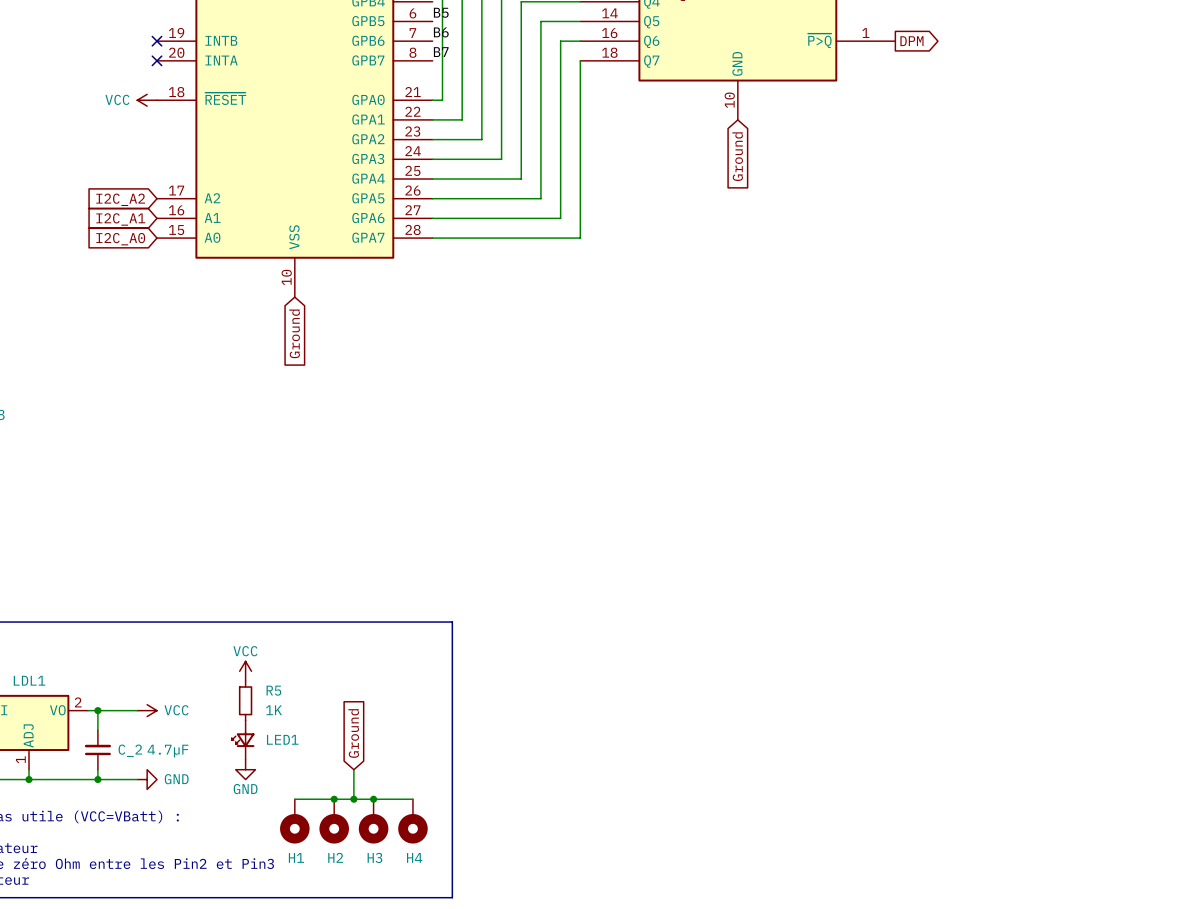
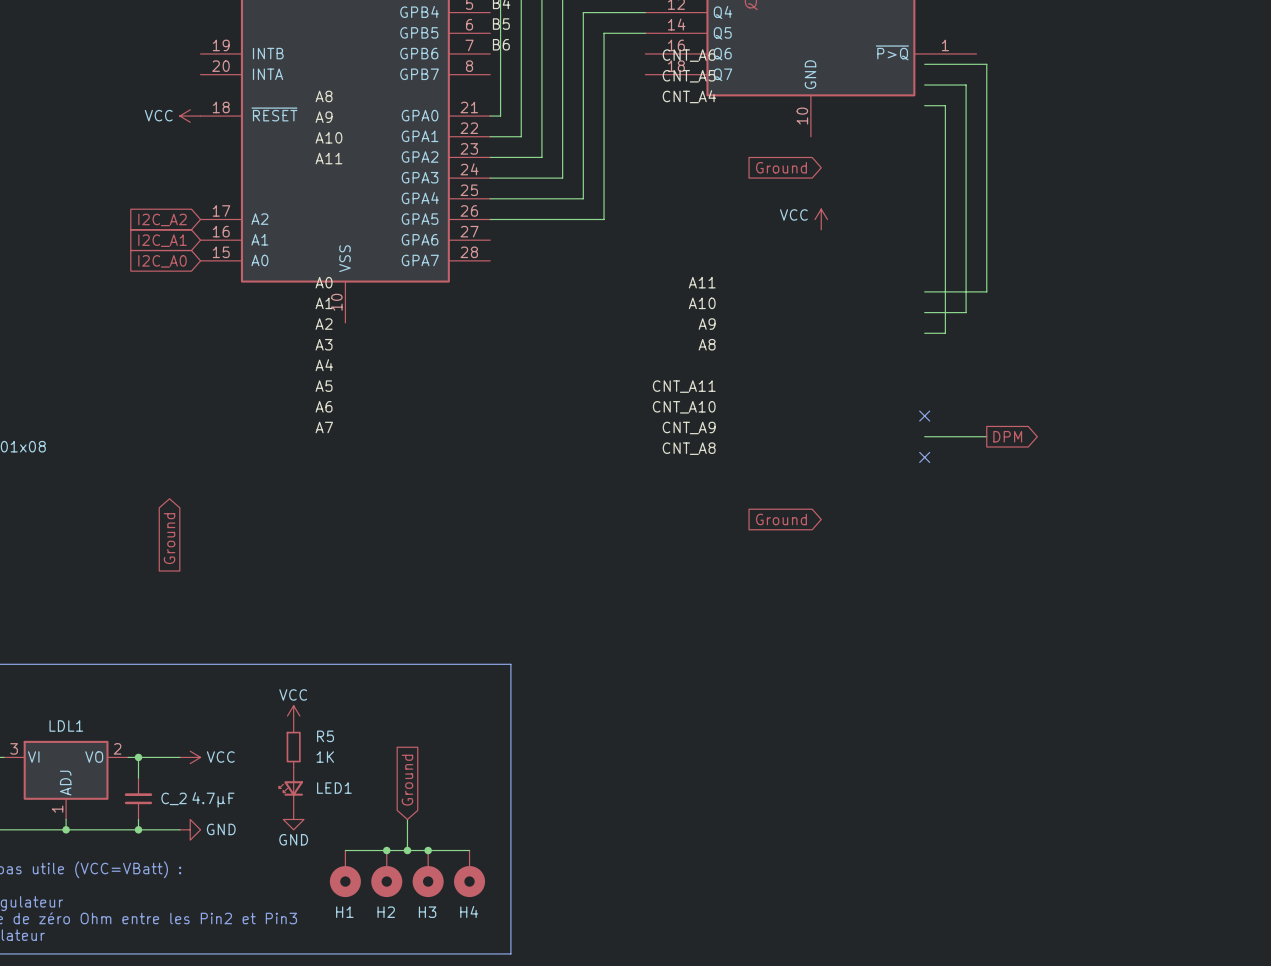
no-connect mark: (156, 41) -> none
wire: (580, 41) (560, 41) (560, 218) (432, 218) -> none
global label: DPM (911, 41) -> none
label: none -> CNT_A6 (689, 55)
wire: none -> (924, 64) (986, 64) (986, 291) (924, 291)
label: B7 (441, 52) -> none
no-connect mark: (156, 60) -> none
wire: (580, 60) (580, 238) (432, 238) -> none
label: none -> CNT_A5 (689, 76)
wire: none -> (924, 85) (966, 85) (966, 312) (924, 312)
label: none -> A8 (324, 96)
label: none -> CNT_A4 (689, 96)
wire: none -> (924, 105) (945, 105) (945, 333) (924, 333)
label: none -> A9 (324, 117)
label: none -> A10 (328, 137)
label: none -> A11 (328, 158)
global label rotation: 0° (737, 156) -> 90° clockwise (781, 167)
power symbol: none -> VCC (821, 219)
label: none -> A0 (324, 282)
label: none -> A11 (702, 282)
label: none -> A1 (324, 303)
label: none -> A10 (702, 303)
label: none -> A2 (324, 324)
label: none -> A9 (707, 324)
label: none -> A3 (324, 344)
label: none -> A8 (707, 344)
global label: Ground (294, 333) -> none
label: none -> A4 (324, 365)
label: none -> A5 (324, 386)
label: none -> CNT_A11 (684, 386)
label: none -> A6 (324, 406)
label: none -> CNT_A10 (684, 407)
no-connect mark: none -> (924, 416)
label: none -> A7 (324, 427)
label: none -> CNT_A9 (689, 427)
wire: none -> (924, 436) (986, 436)
global label: none -> DPM (1007, 436)
label: none -> CNT_A8 (689, 448)
no-connect mark: none -> (924, 457)
global label: none -> Ground (781, 519)
global label: none -> Ground (169, 538)

